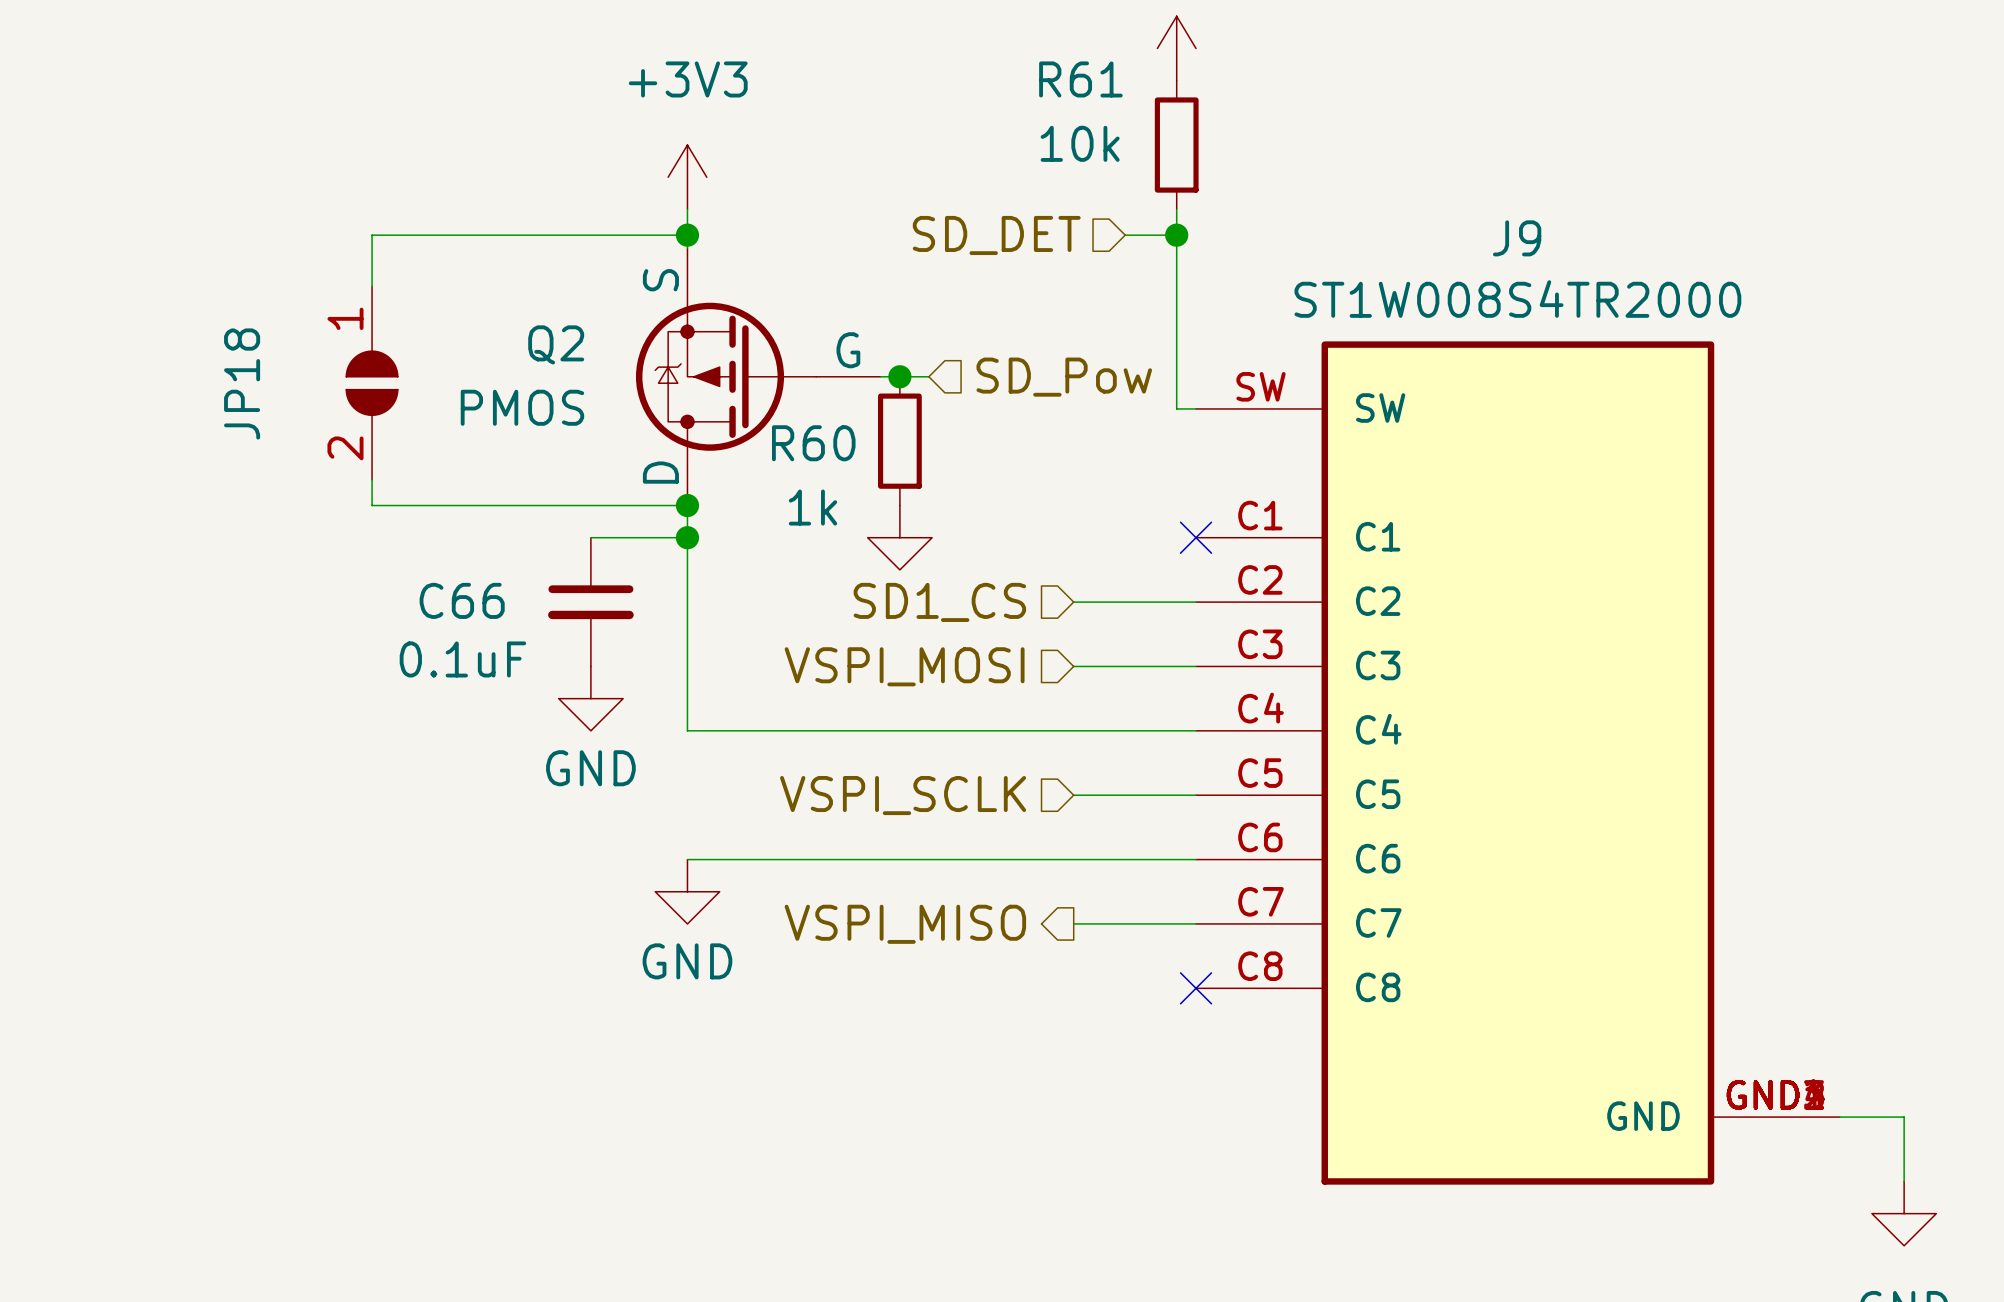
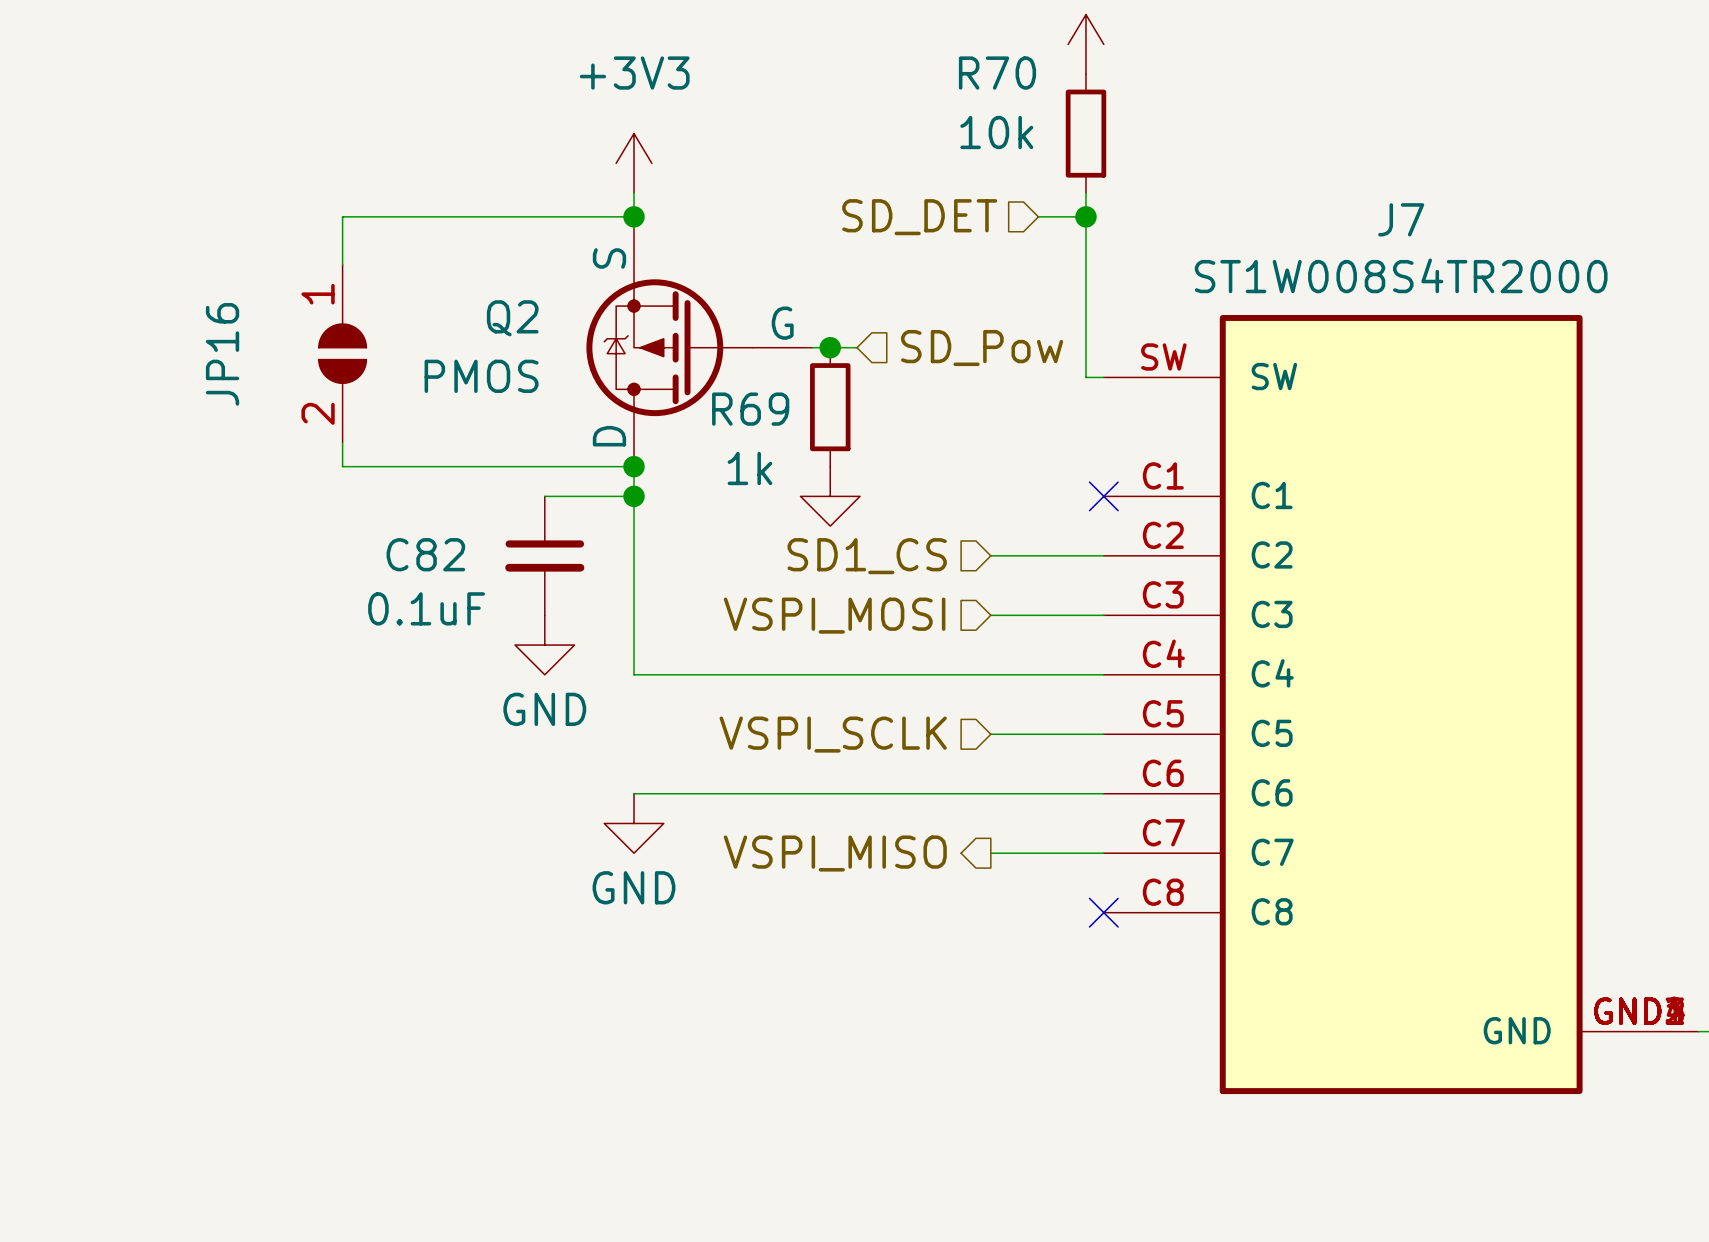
R61 name: R61 (1080, 79) -> R70 (997, 73)
J9 name: J9 (1517, 238) -> J7 (1401, 219)
JP18 name: JP18 (242, 383) -> JP16 (222, 354)
R60 name: R60 (813, 443) -> R69 (750, 409)
C66 name: C66 (462, 600) -> C82 (425, 554)

